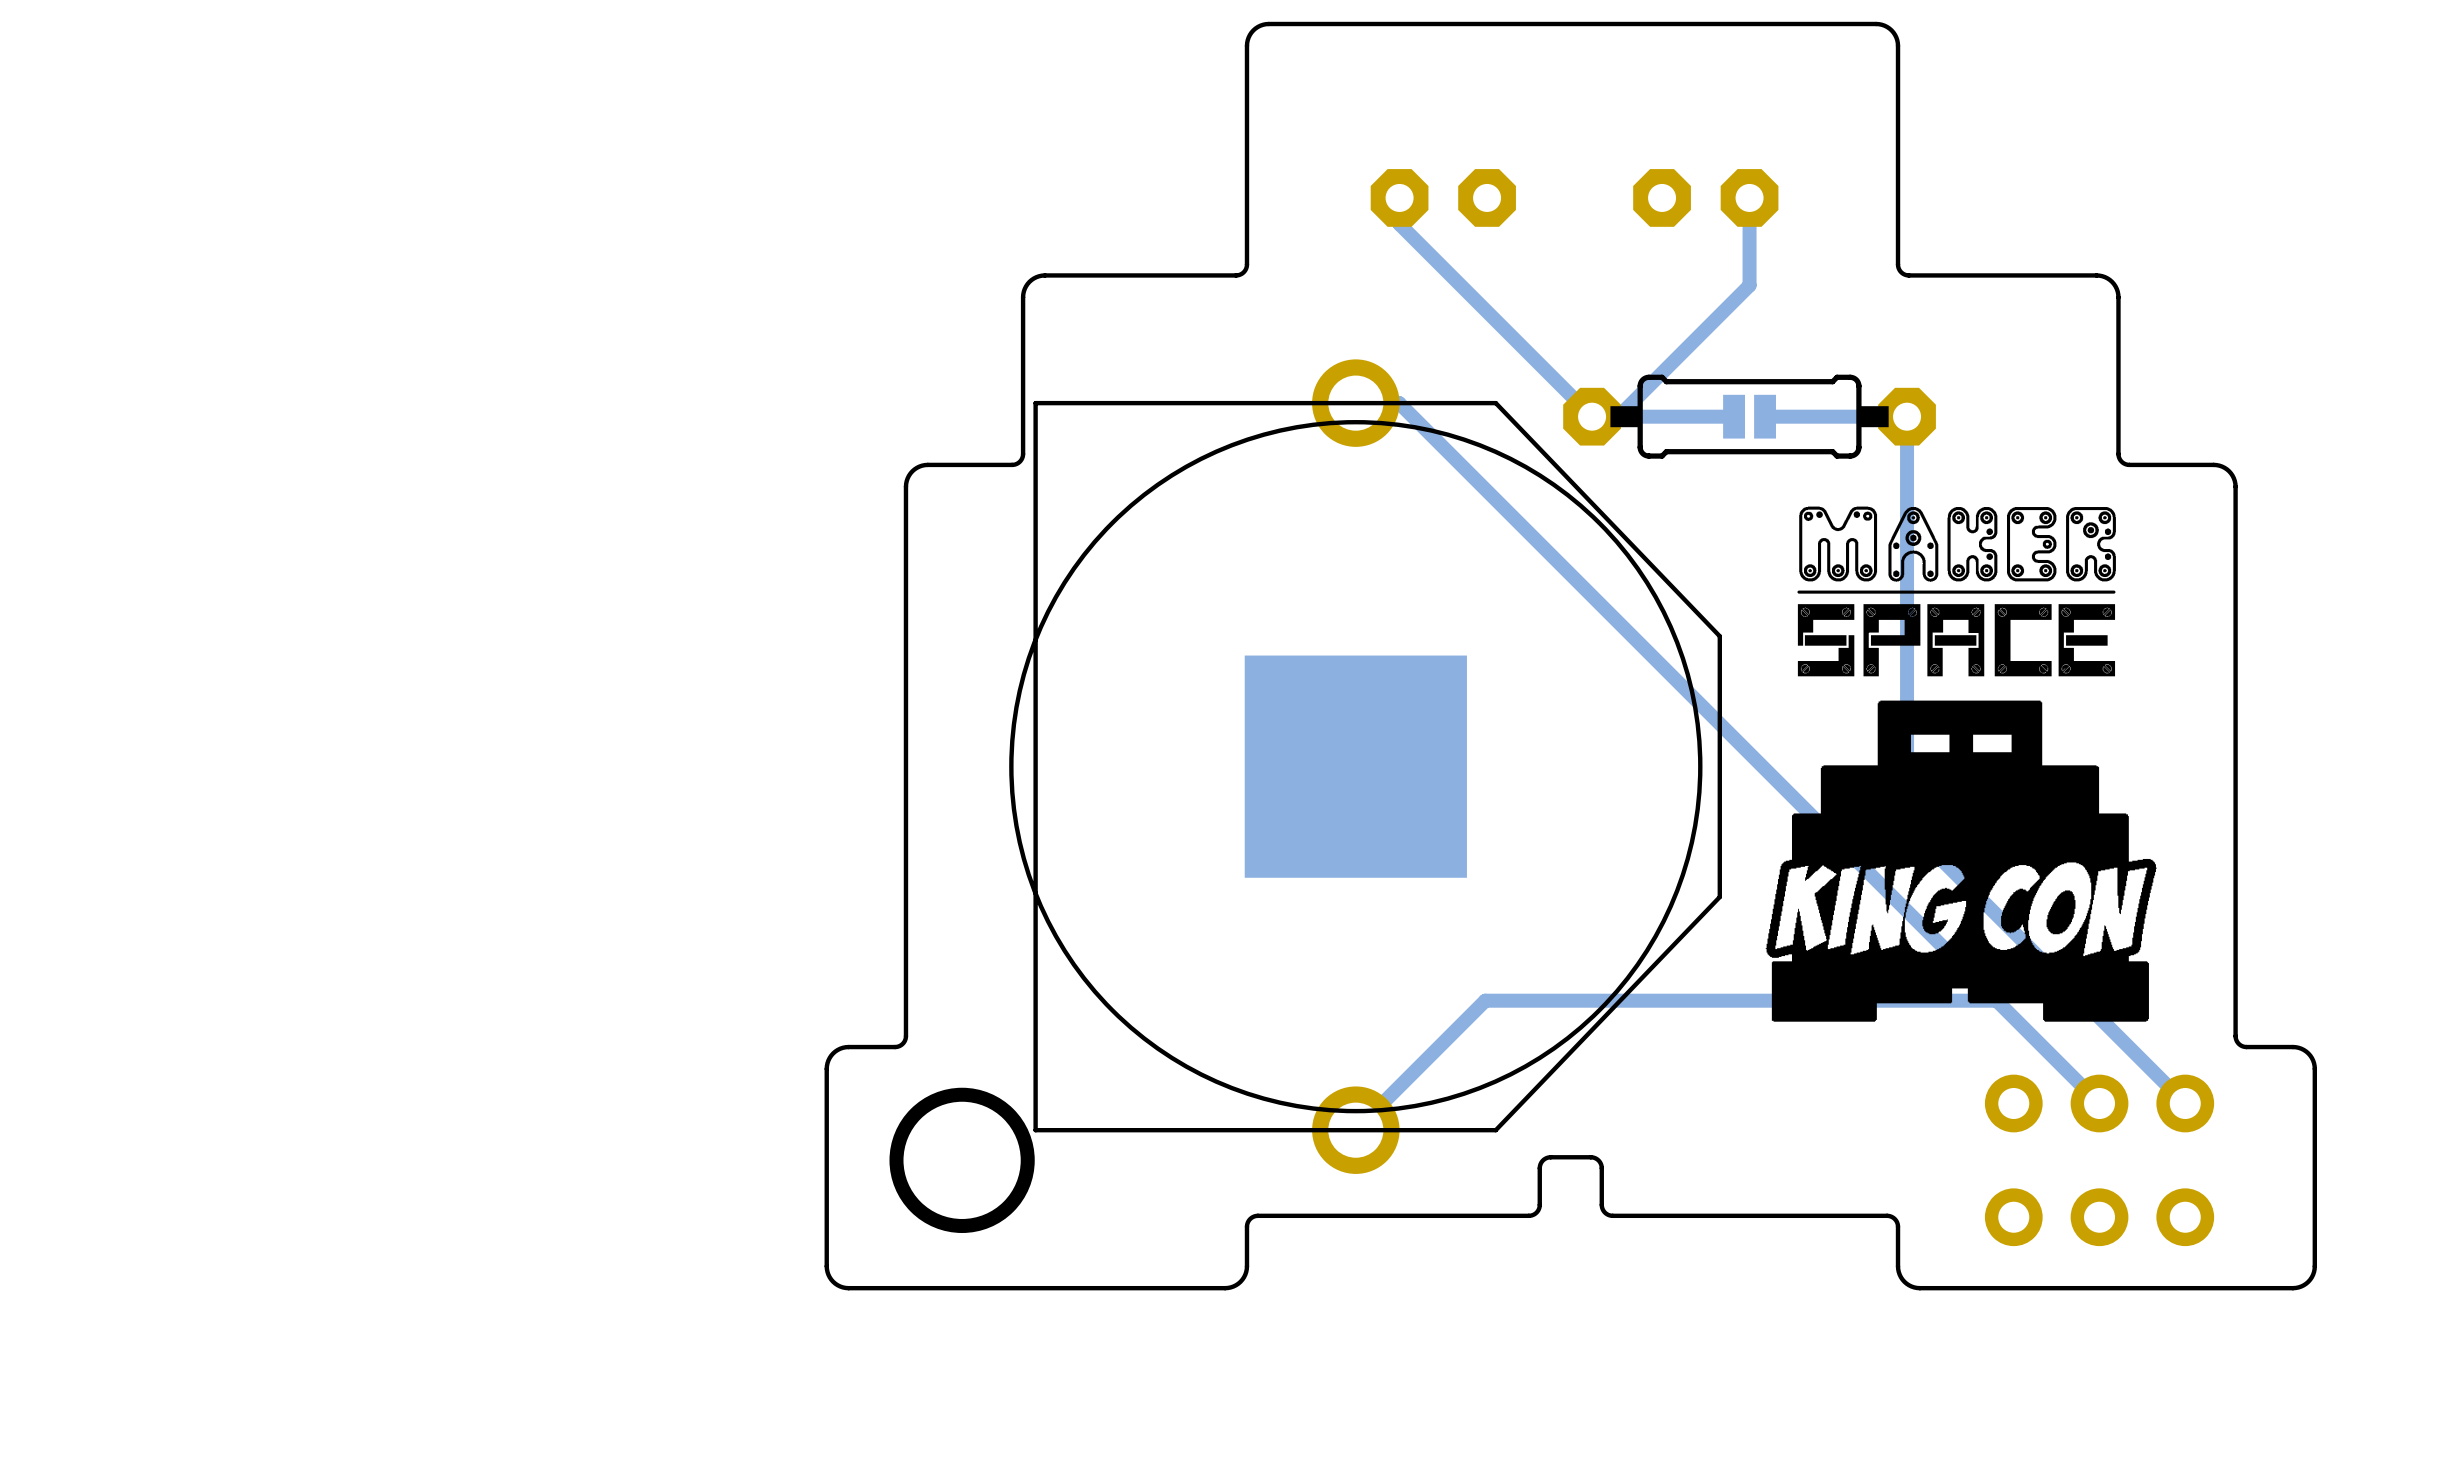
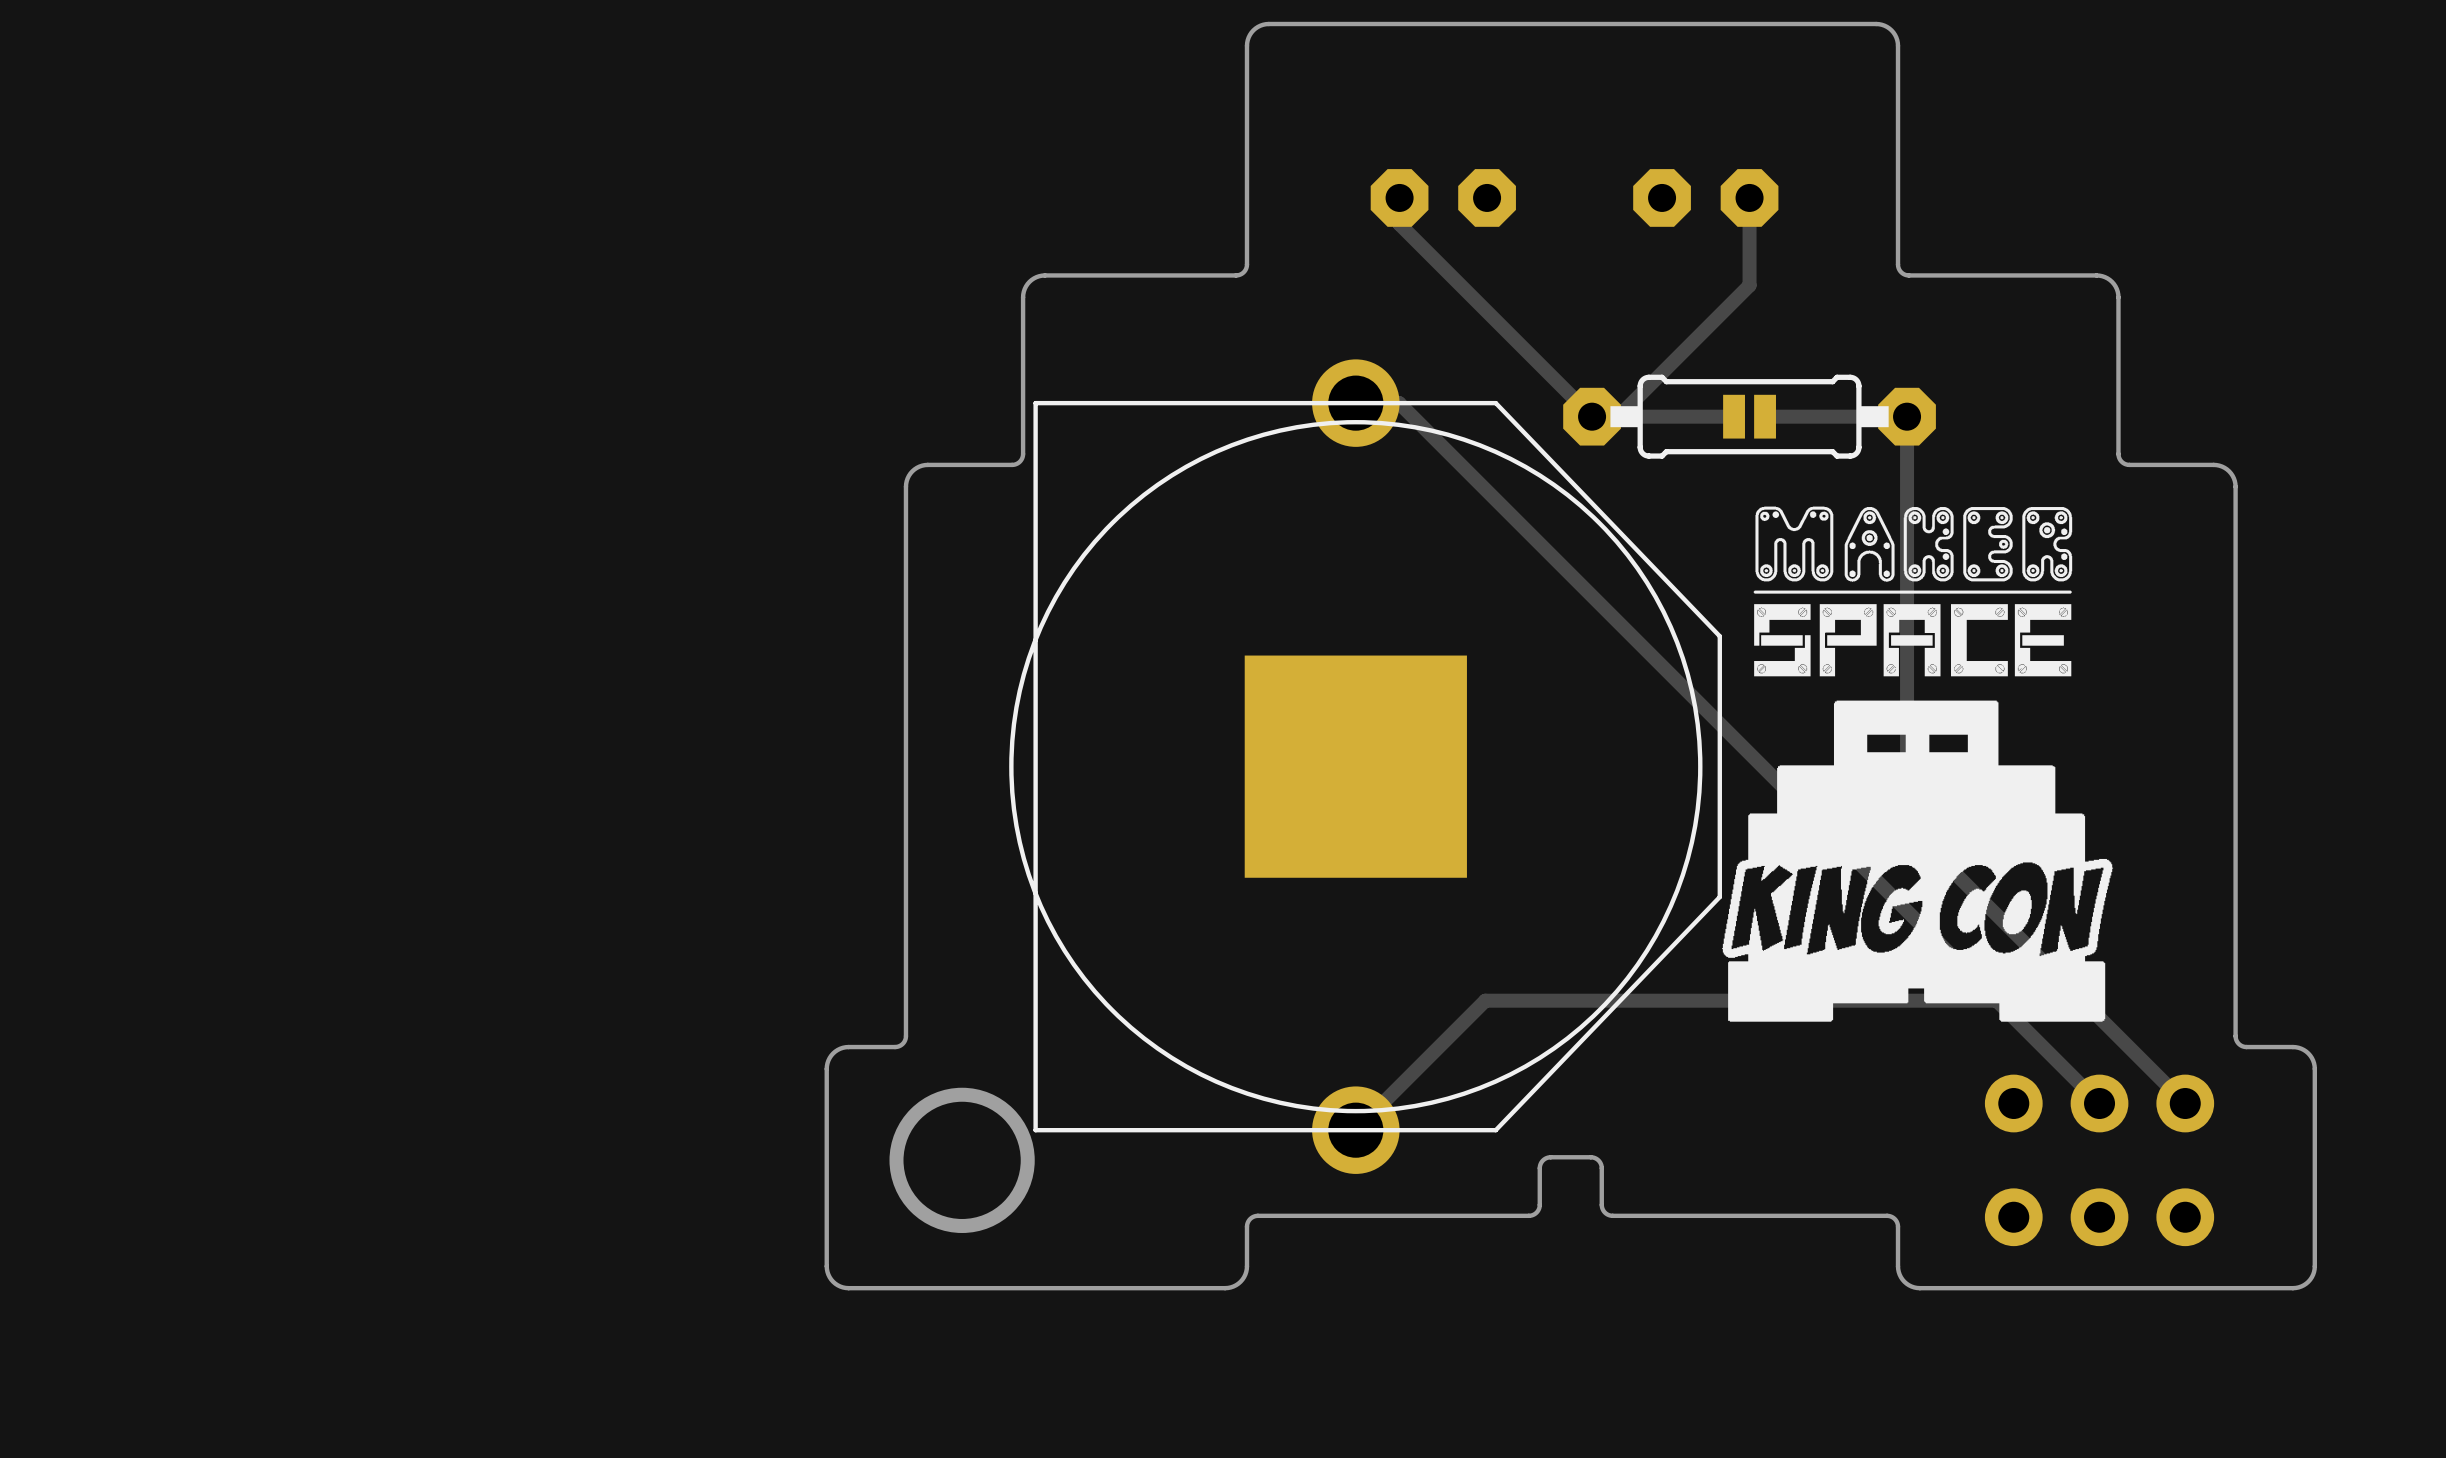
drawing position: (1956, 591) -> (1912, 591)
drawing position: (1961, 861) -> (1917, 861)

